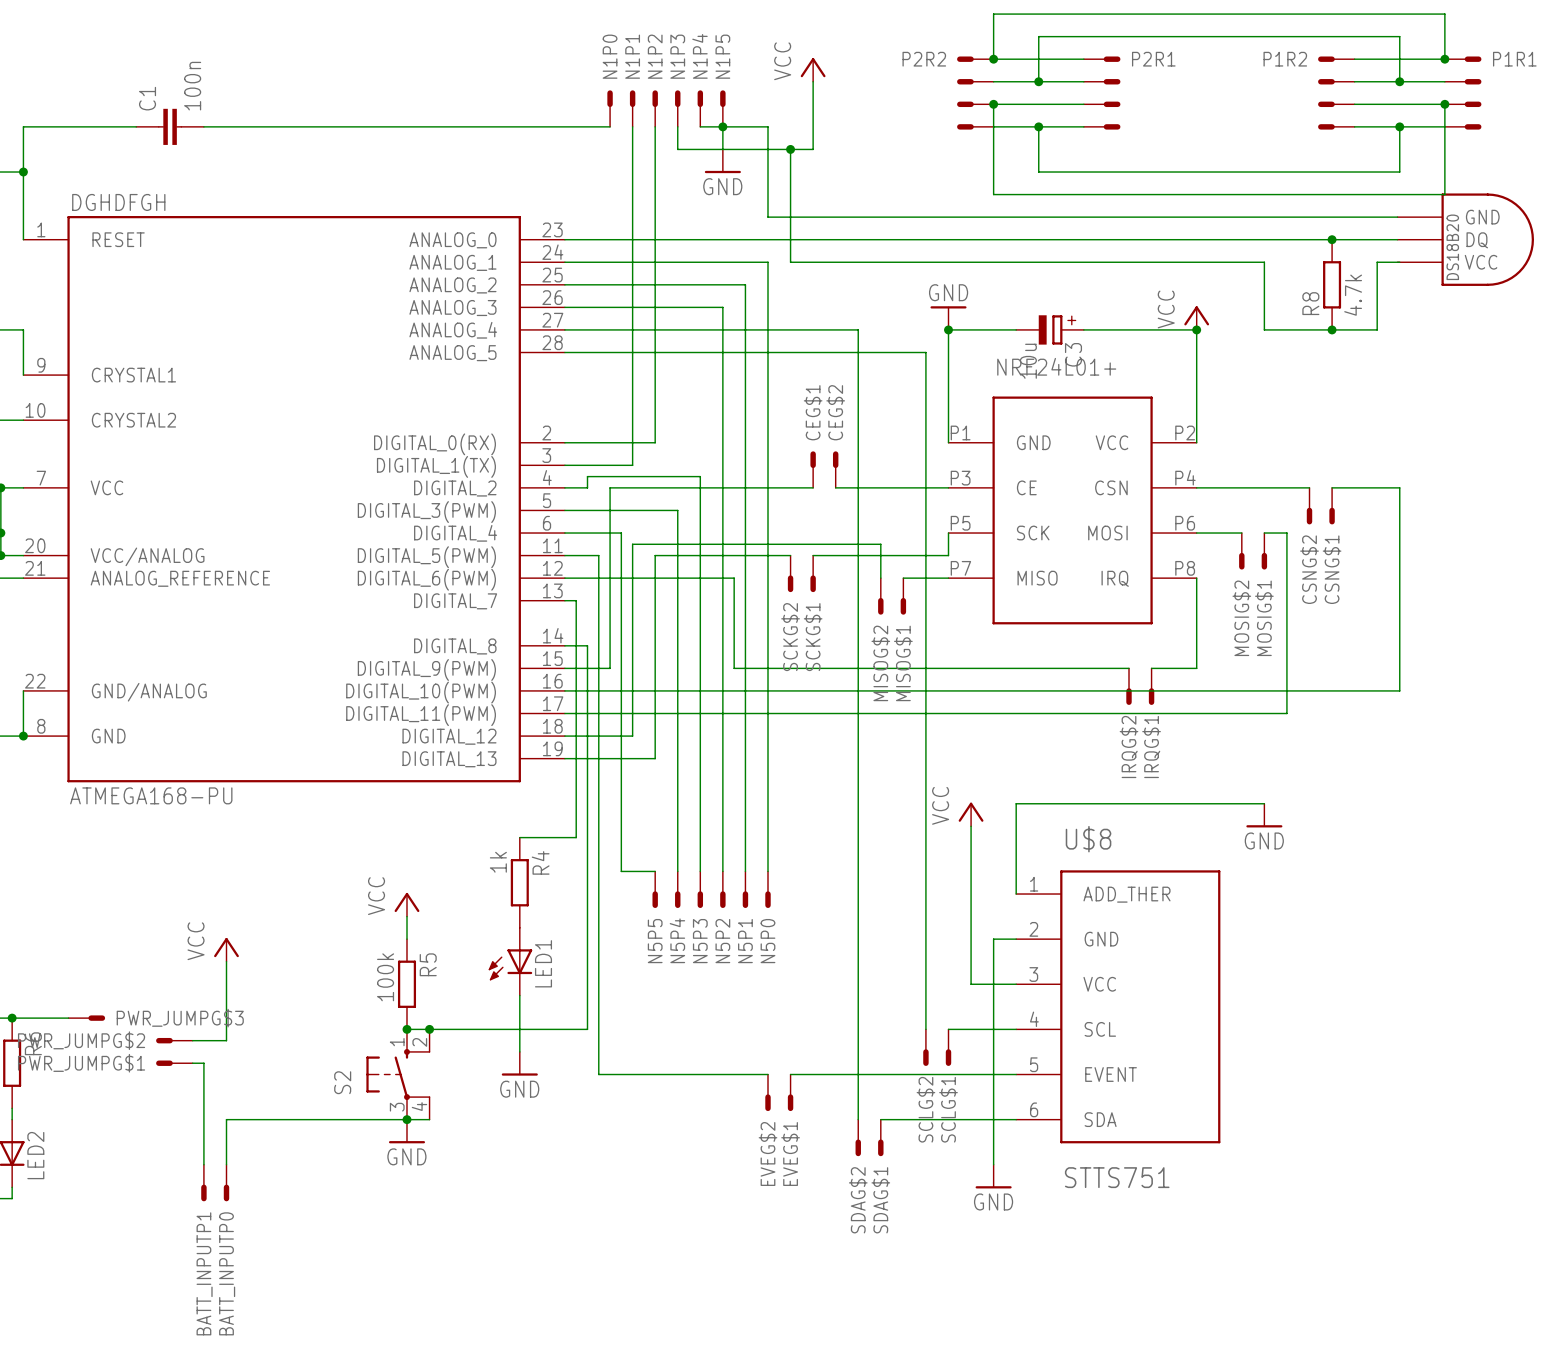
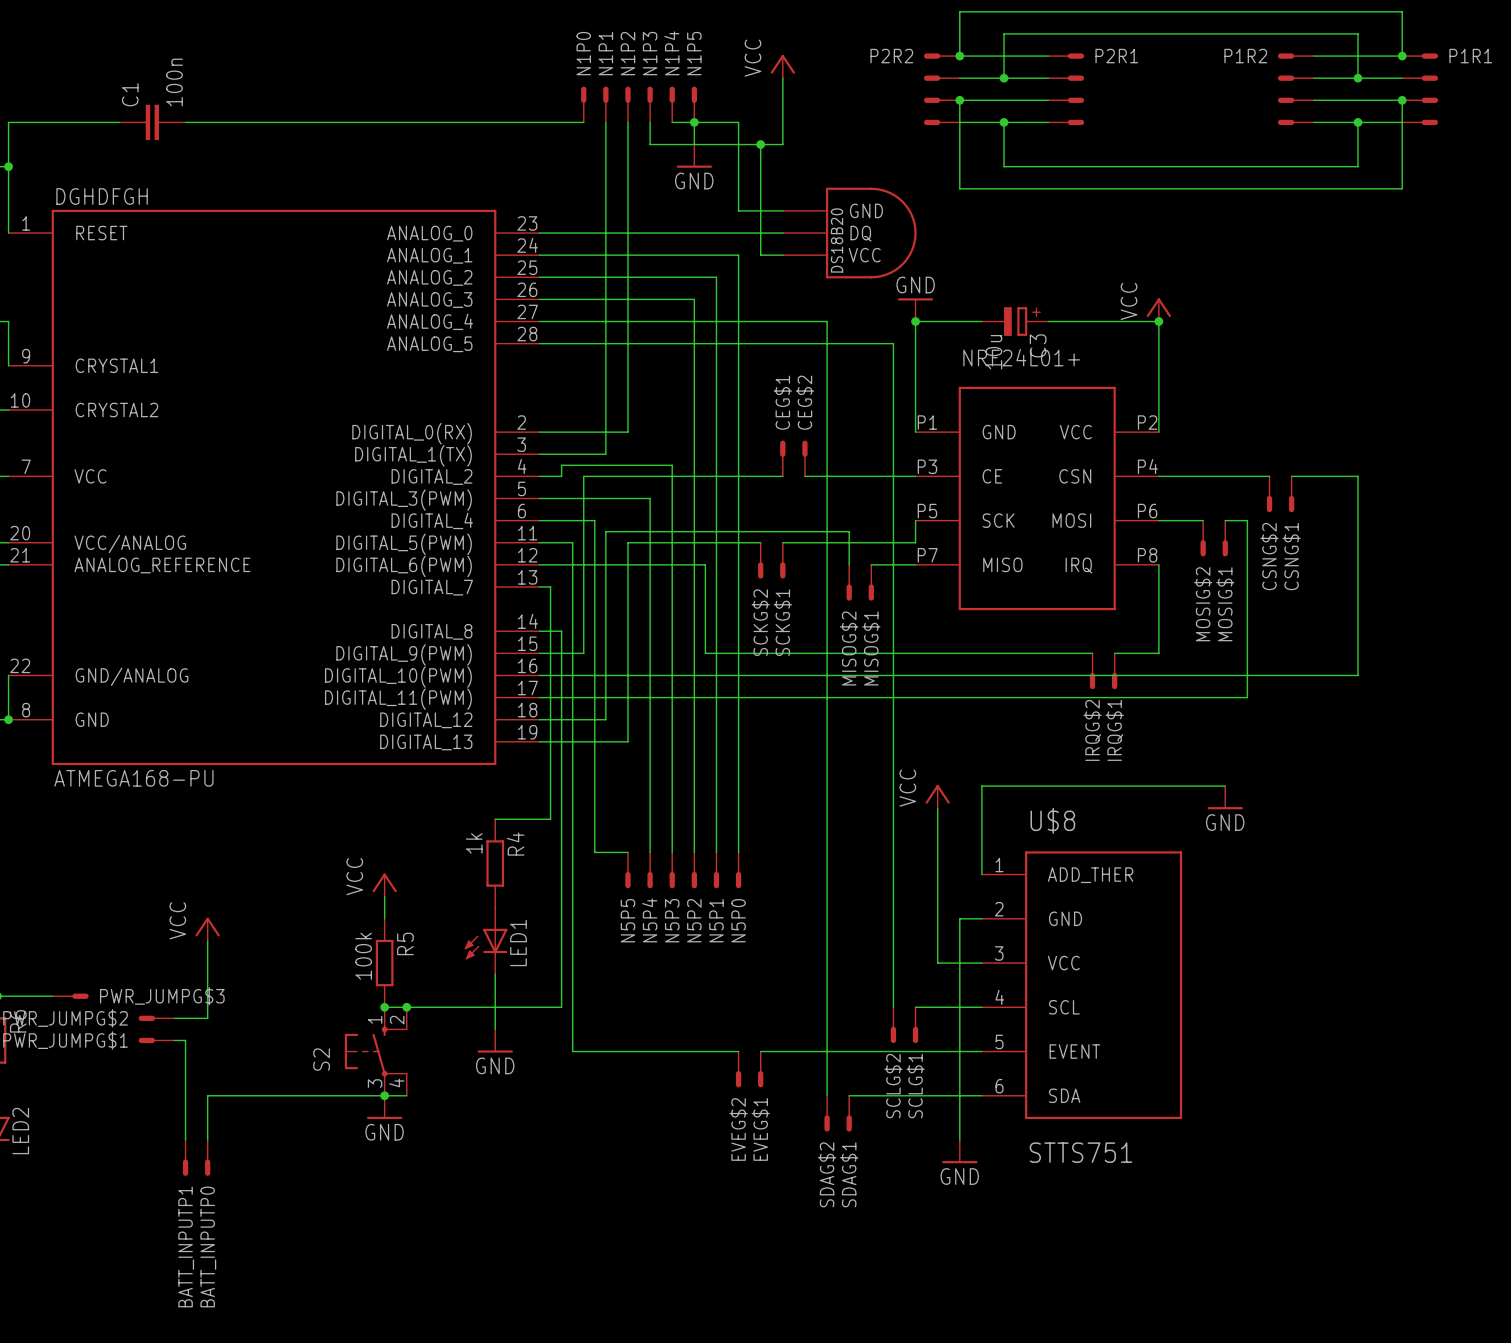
wire: (813, 217) (1397, 217) -> none
wire: (813, 239) (1397, 239) -> none
part: none -> (849, 233)
junction: (1332, 239) -> none
part: (1465, 239) -> none
wire: (813, 262) (1264, 262) (1264, 329) (1377, 329) (1377, 262) (1399, 262) -> none
R8: 4.7k (1332, 284) -> none
junction: (1332, 329) -> none

